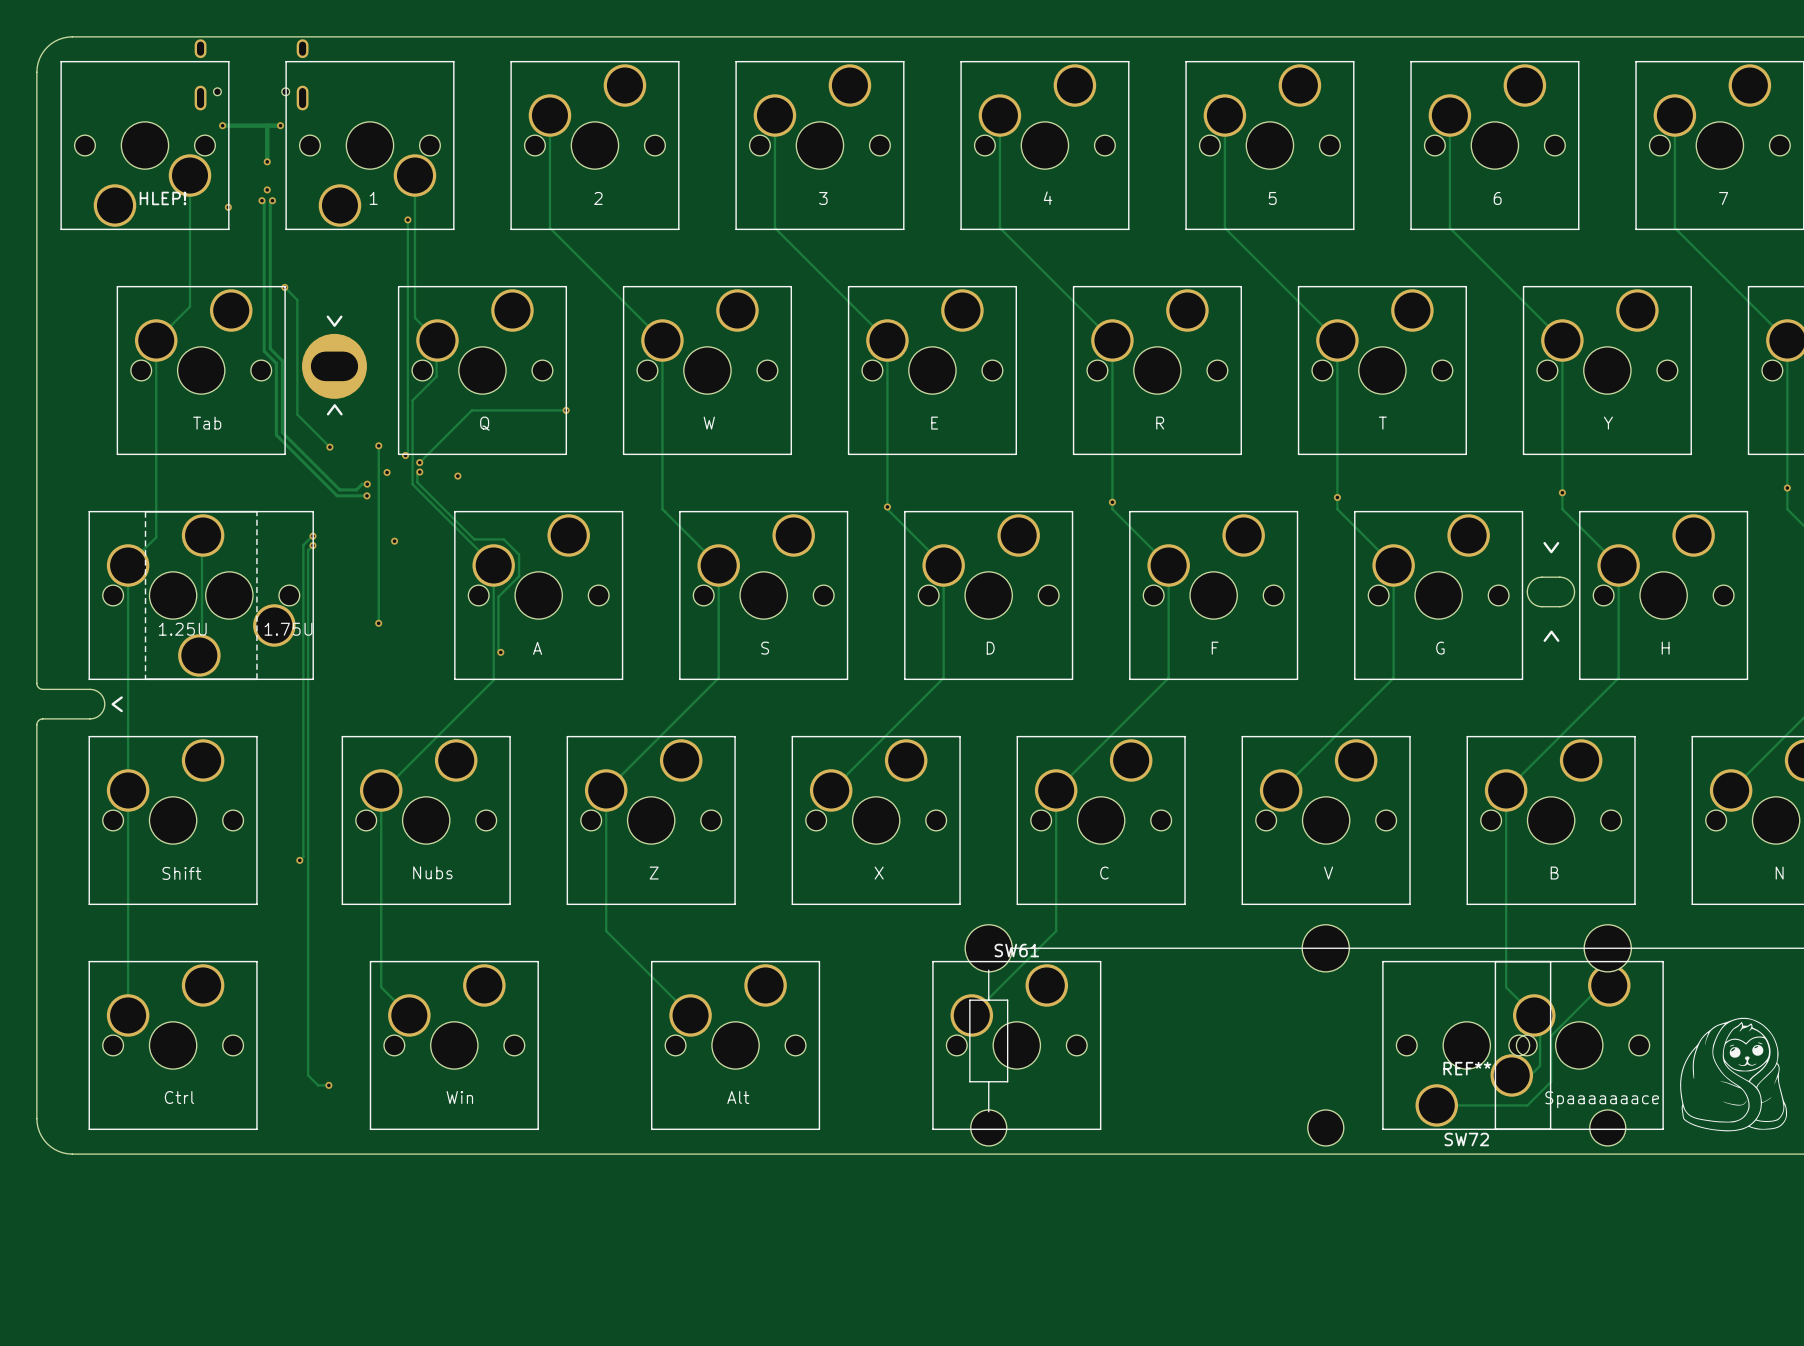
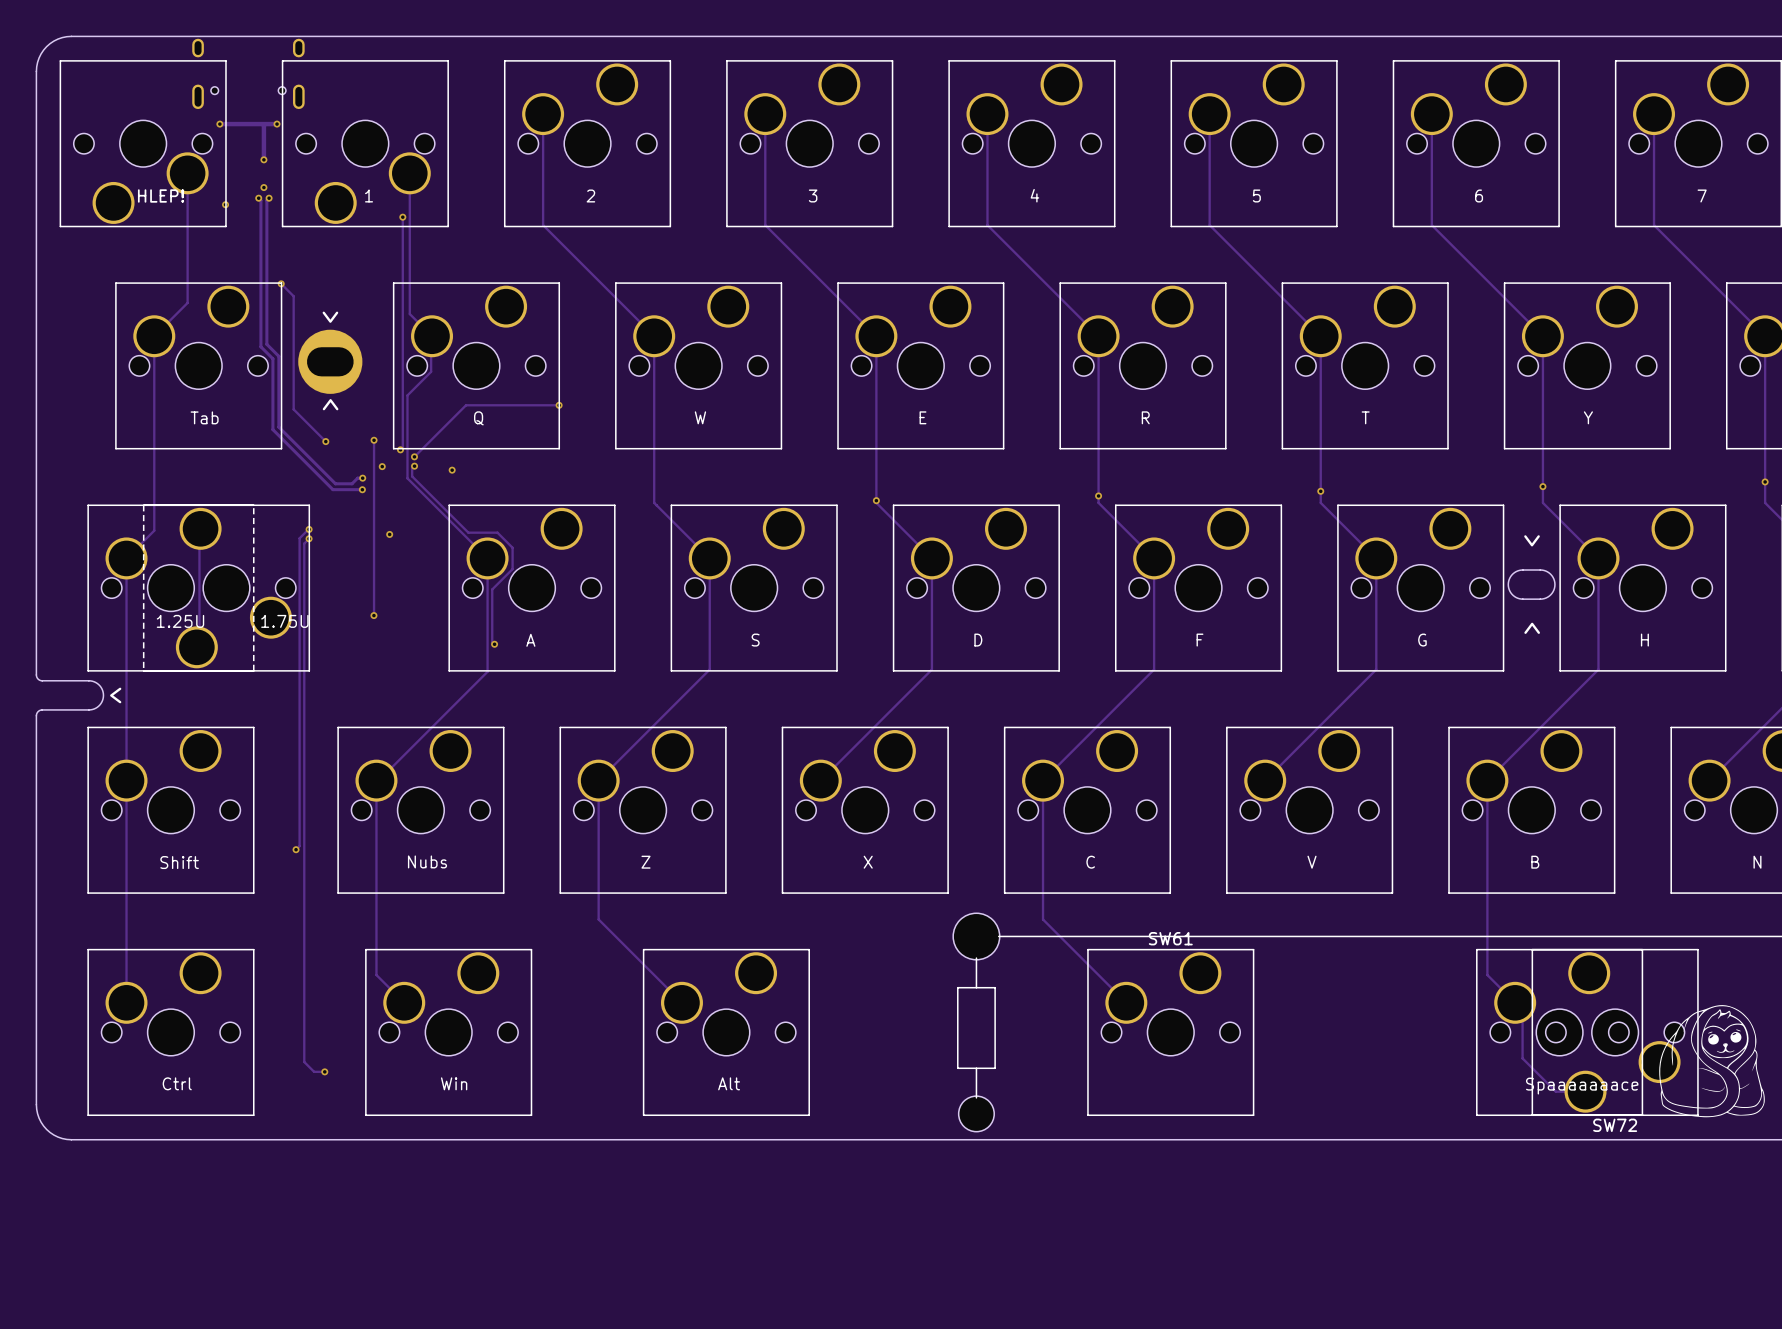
track: (1056, 931) (971, 1015) -> (1043, 919) (1126, 1002)
track: (1609, 985) (1601, 985) (1551, 1035) (1551, 1081) (1527, 1105) (1436, 1105) -> none
track: (1540, 1021) (1540, 1065) (1530, 1075) (1511, 1075) -> (1520, 1008) (1522, 1010) (1522, 1058) (1555, 1091) (1585, 1091)
REF**: (1466, 1035) -> none
SW61 position: (1016, 1045) -> (1170, 1032)
SW72 position: (1466, 1045) -> (1615, 1032)

